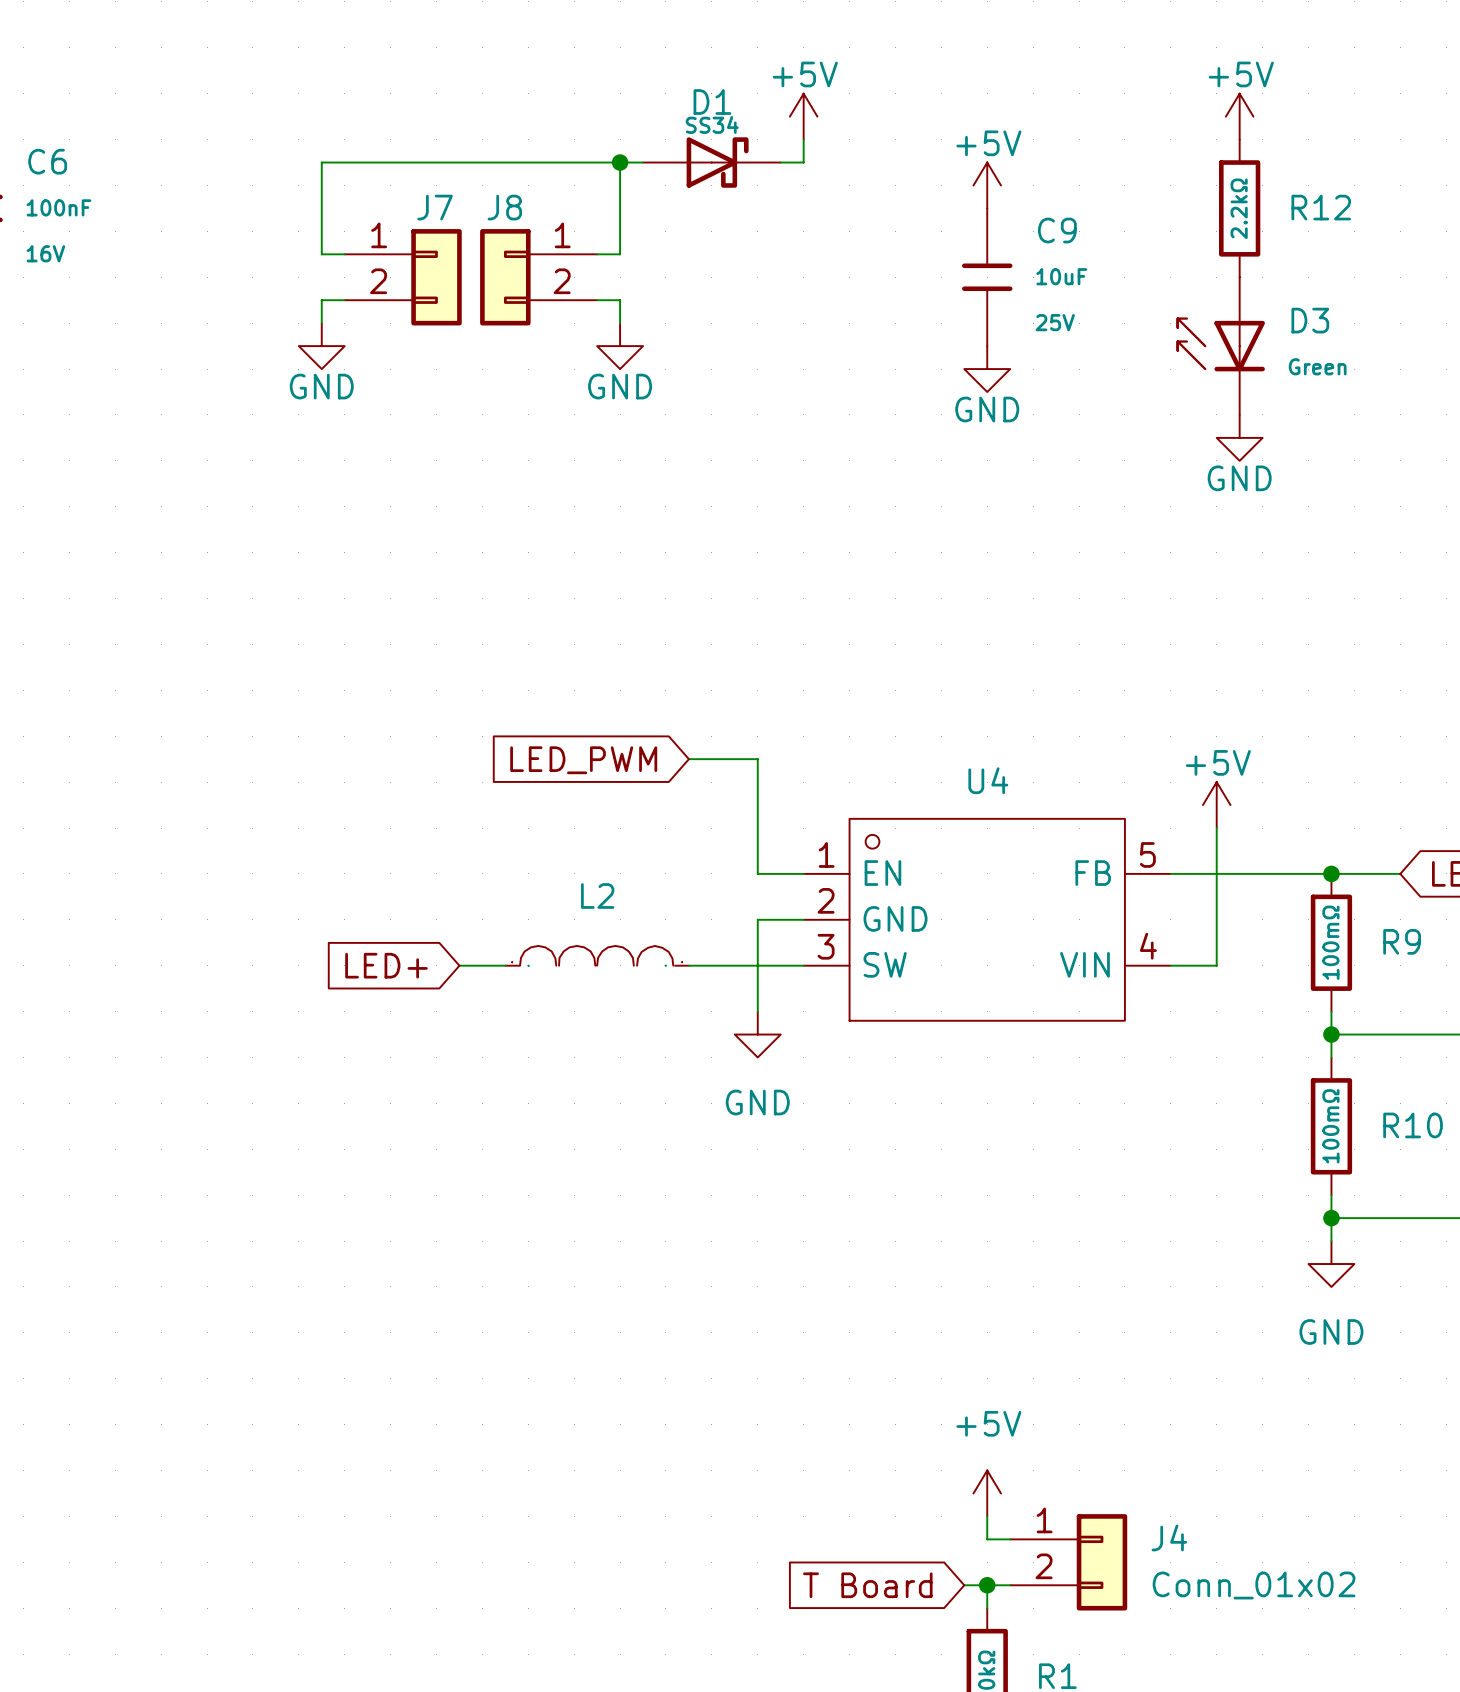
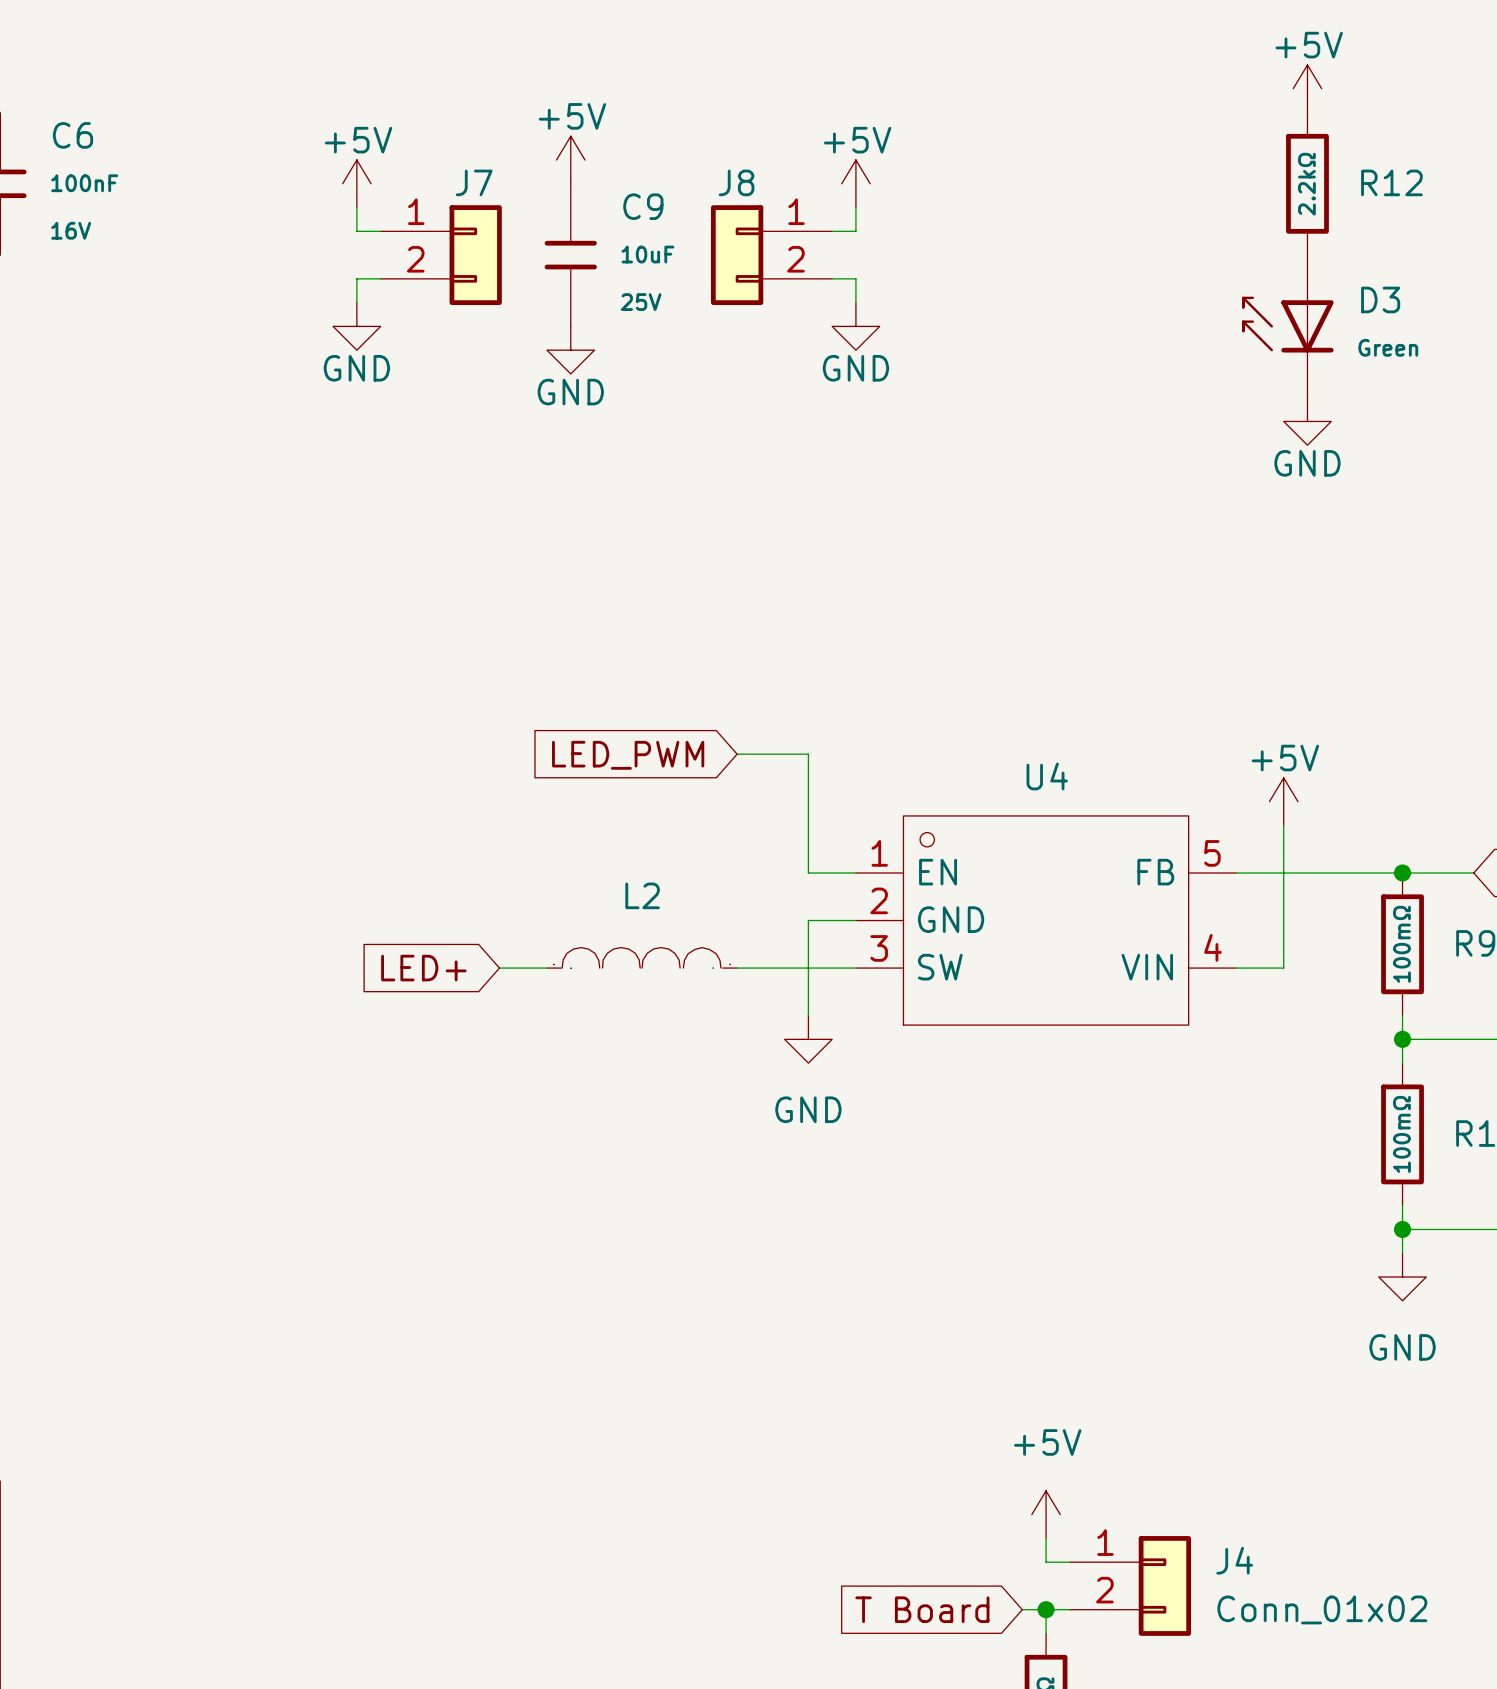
power symbol position: +5V (803, 116) -> +5V (855, 183)
wire: (803, 139) (803, 162) (780, 162) -> (855, 207) (855, 231) (832, 231)
wire: (620, 162) (620, 254) (597, 254) -> none
junction: (620, 162) -> none
wire: (643, 162) (321, 162) (321, 231) -> none
D1: SS34 (711, 162) -> none
power symbol: none -> +5V (570, 160)
power symbol: +5V (987, 185) -> none
power symbol: none -> +5V (356, 183)
J8 position: (538, 277) -> (771, 255)
C9 position: (987, 277) -> (570, 255)
wire: (597, 300) (620, 300) (620, 323) -> (832, 278) (855, 278) (855, 302)
power symbol: GND (620, 346) -> none
power symbol: none -> GND (855, 326)
power symbol: none -> GND (570, 350)
power symbol: GND (987, 369) -> none

